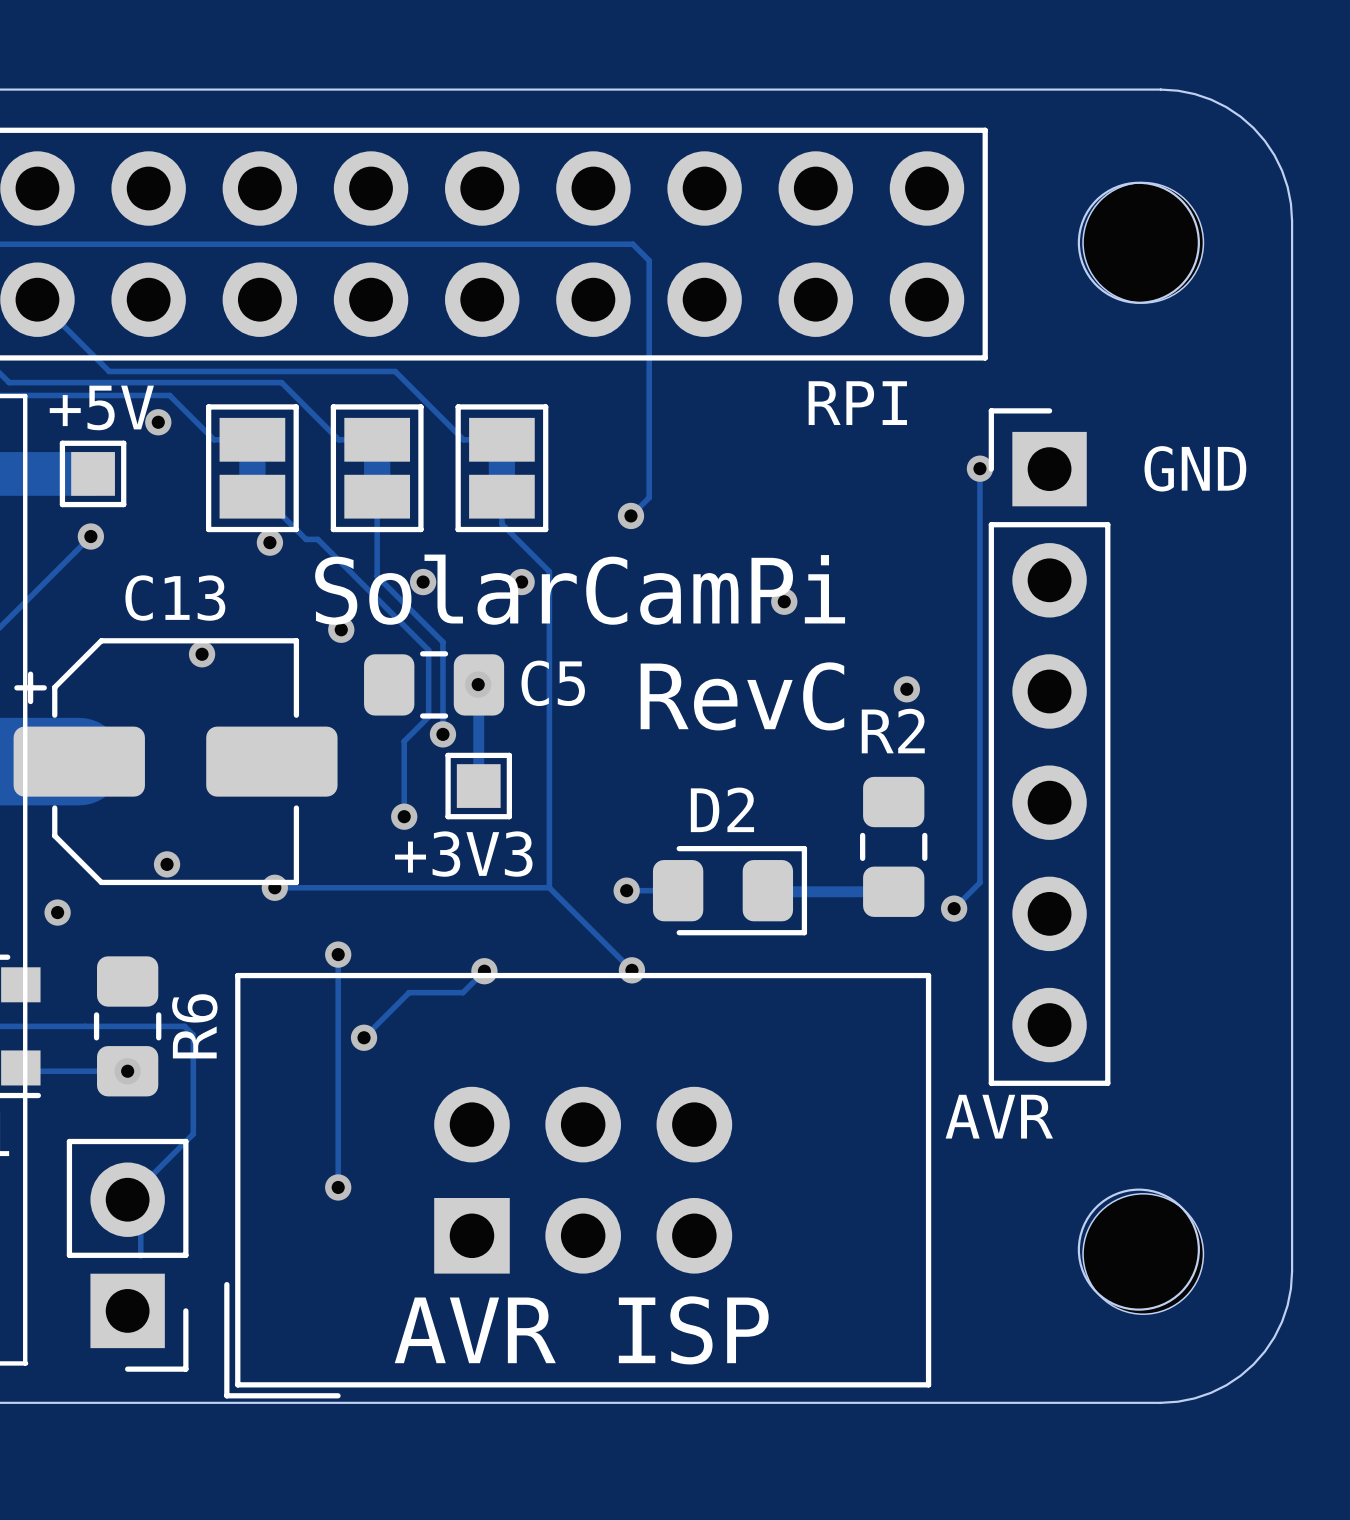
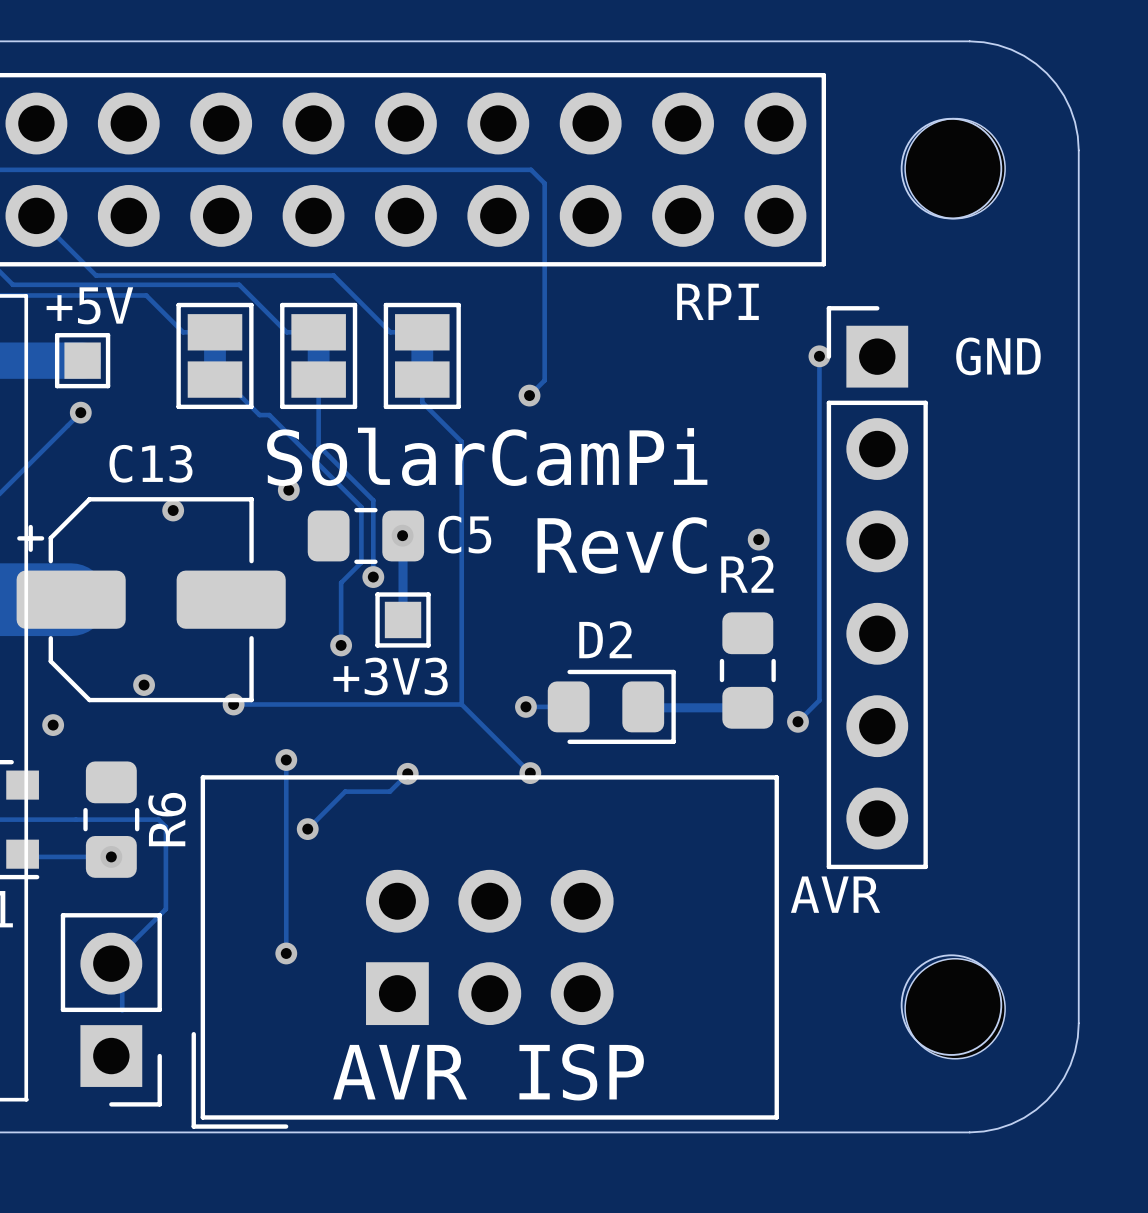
via: (158, 422) -> none
via: (269, 542) -> none
via: (423, 582) -> none
via: (521, 582) -> none
via: (784, 601) -> none

